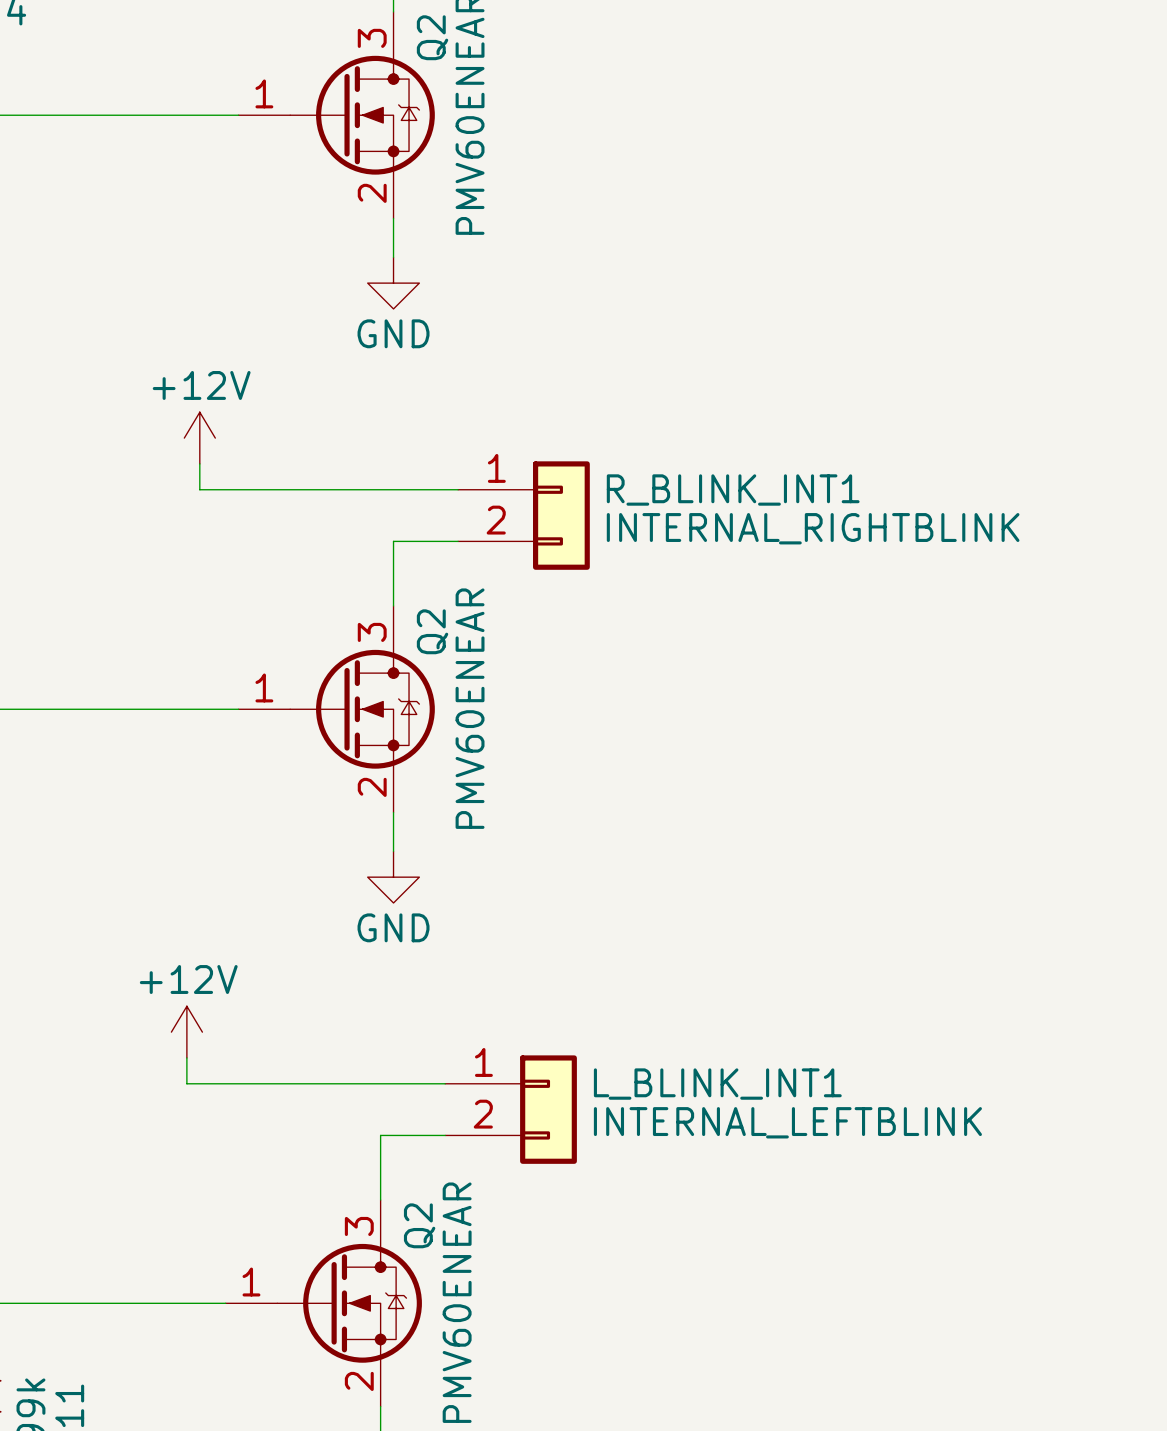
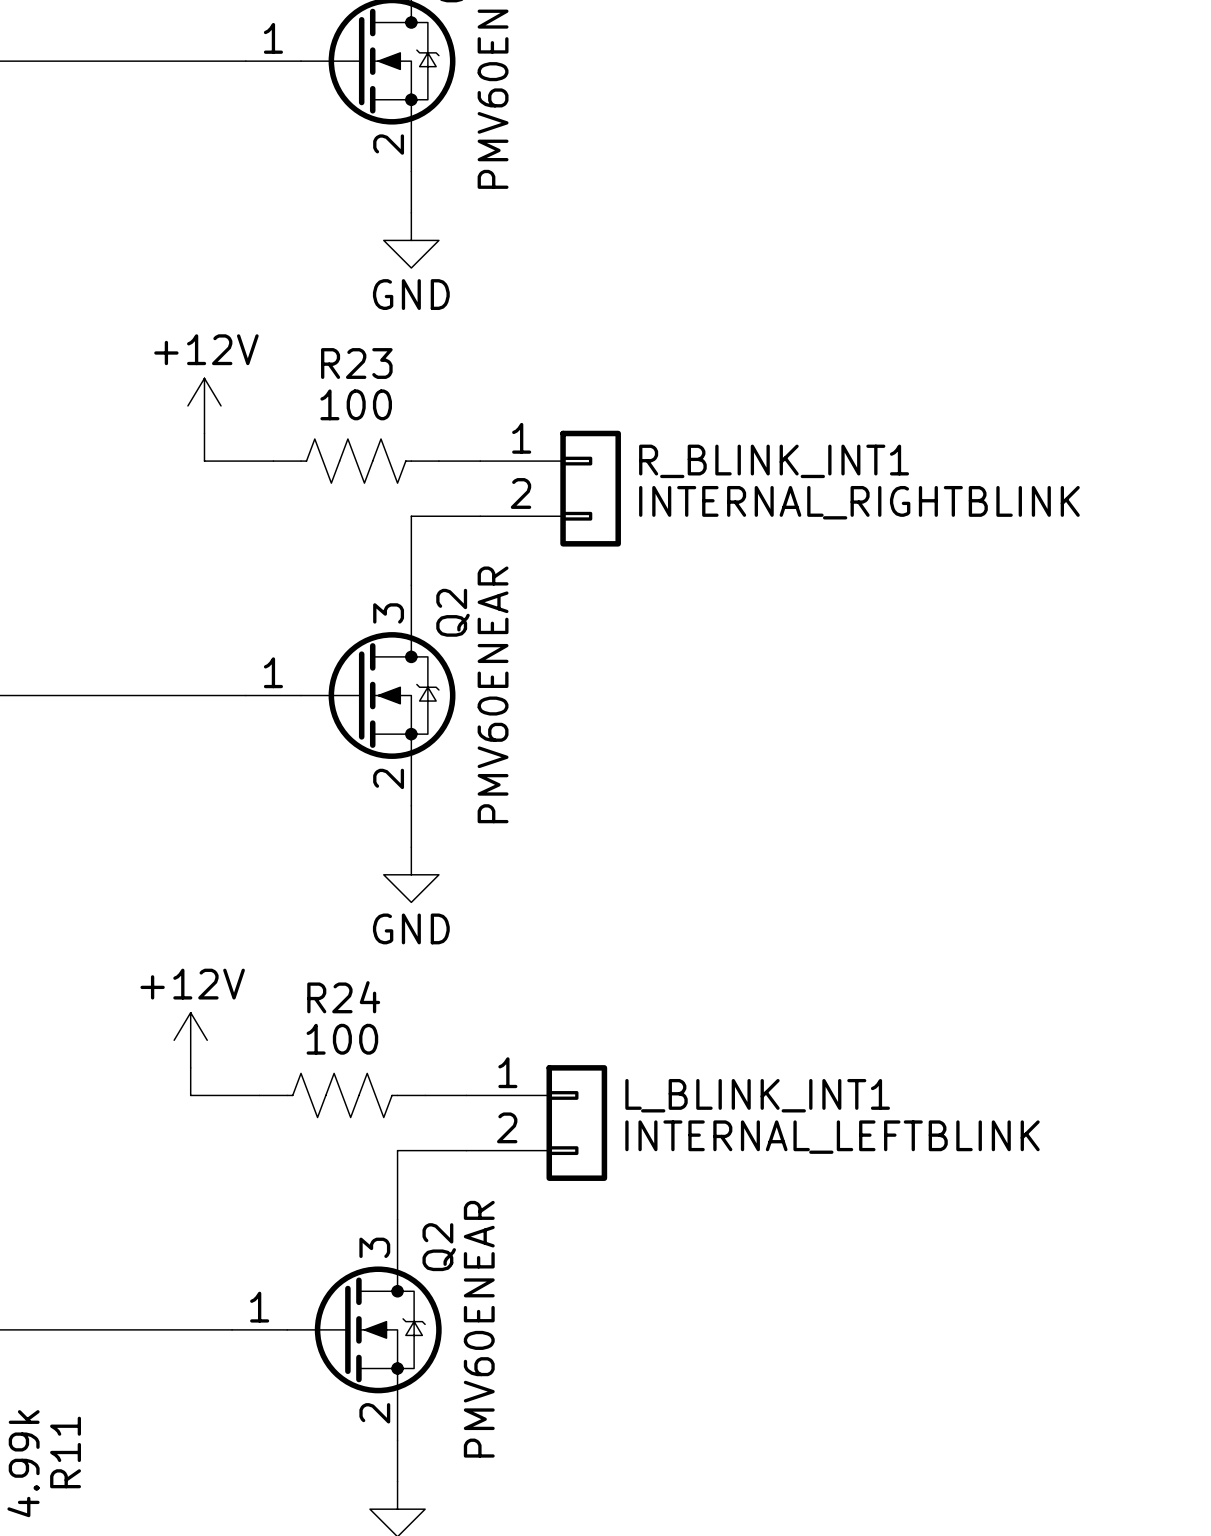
wire: (264, 489) (419, 489) -> none
R23: none -> 100 (356, 461)
wire: (251, 1083) (406, 1083) -> none
R24: none -> 100 (342, 1095)

